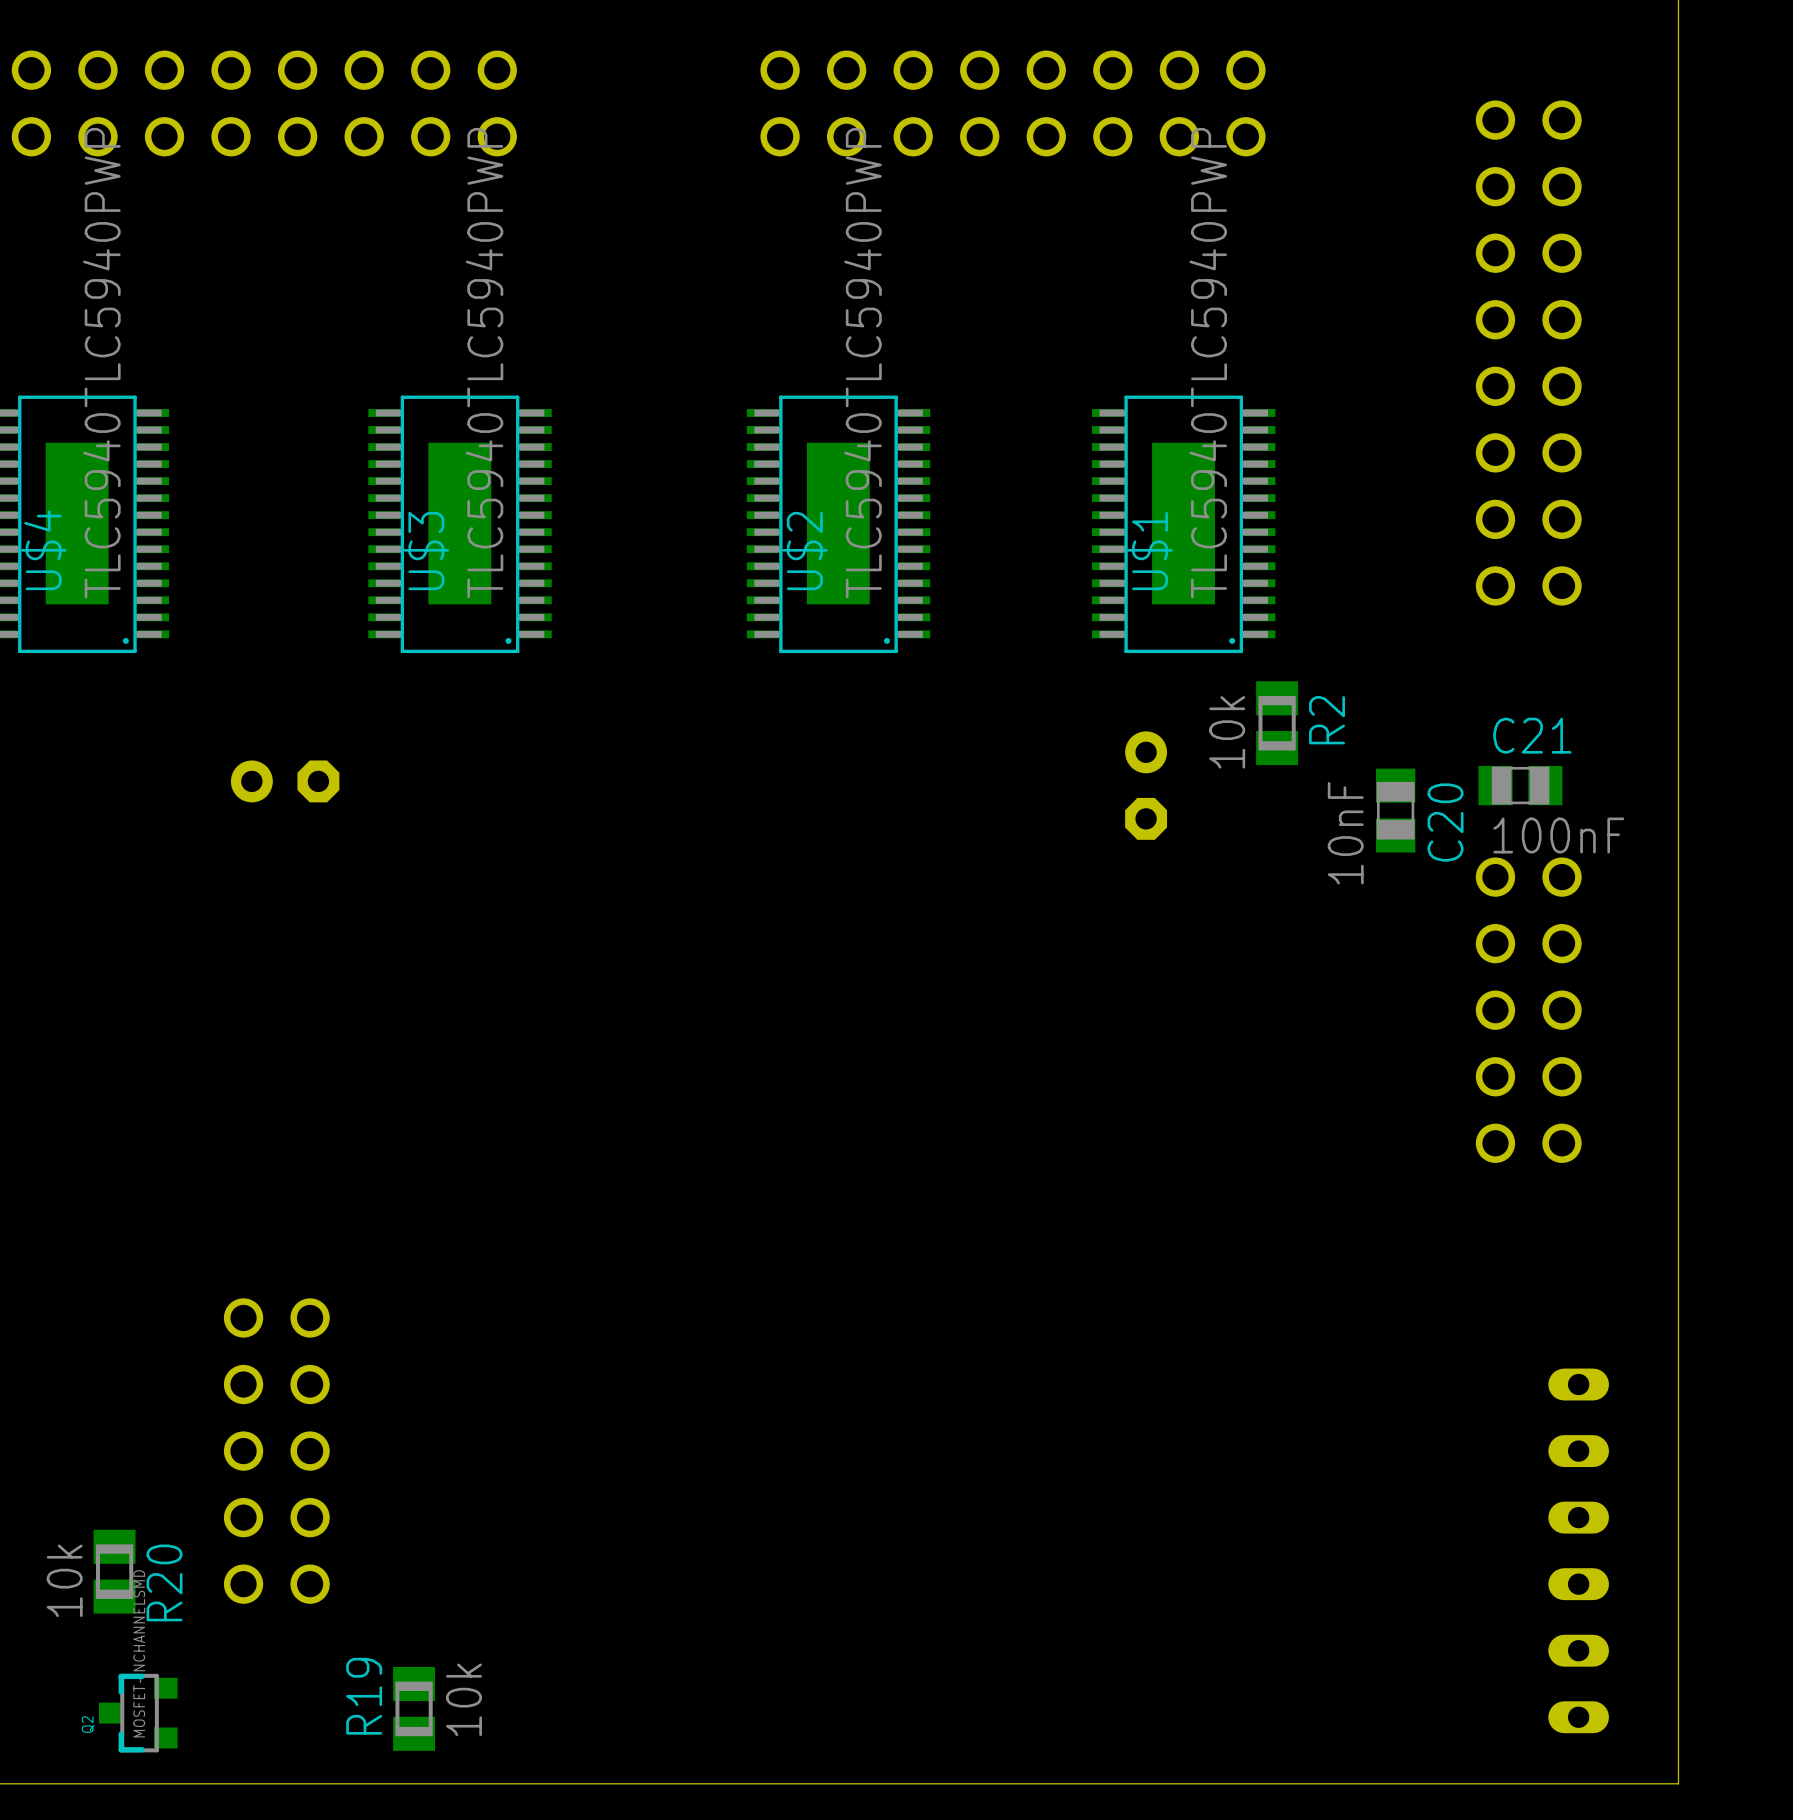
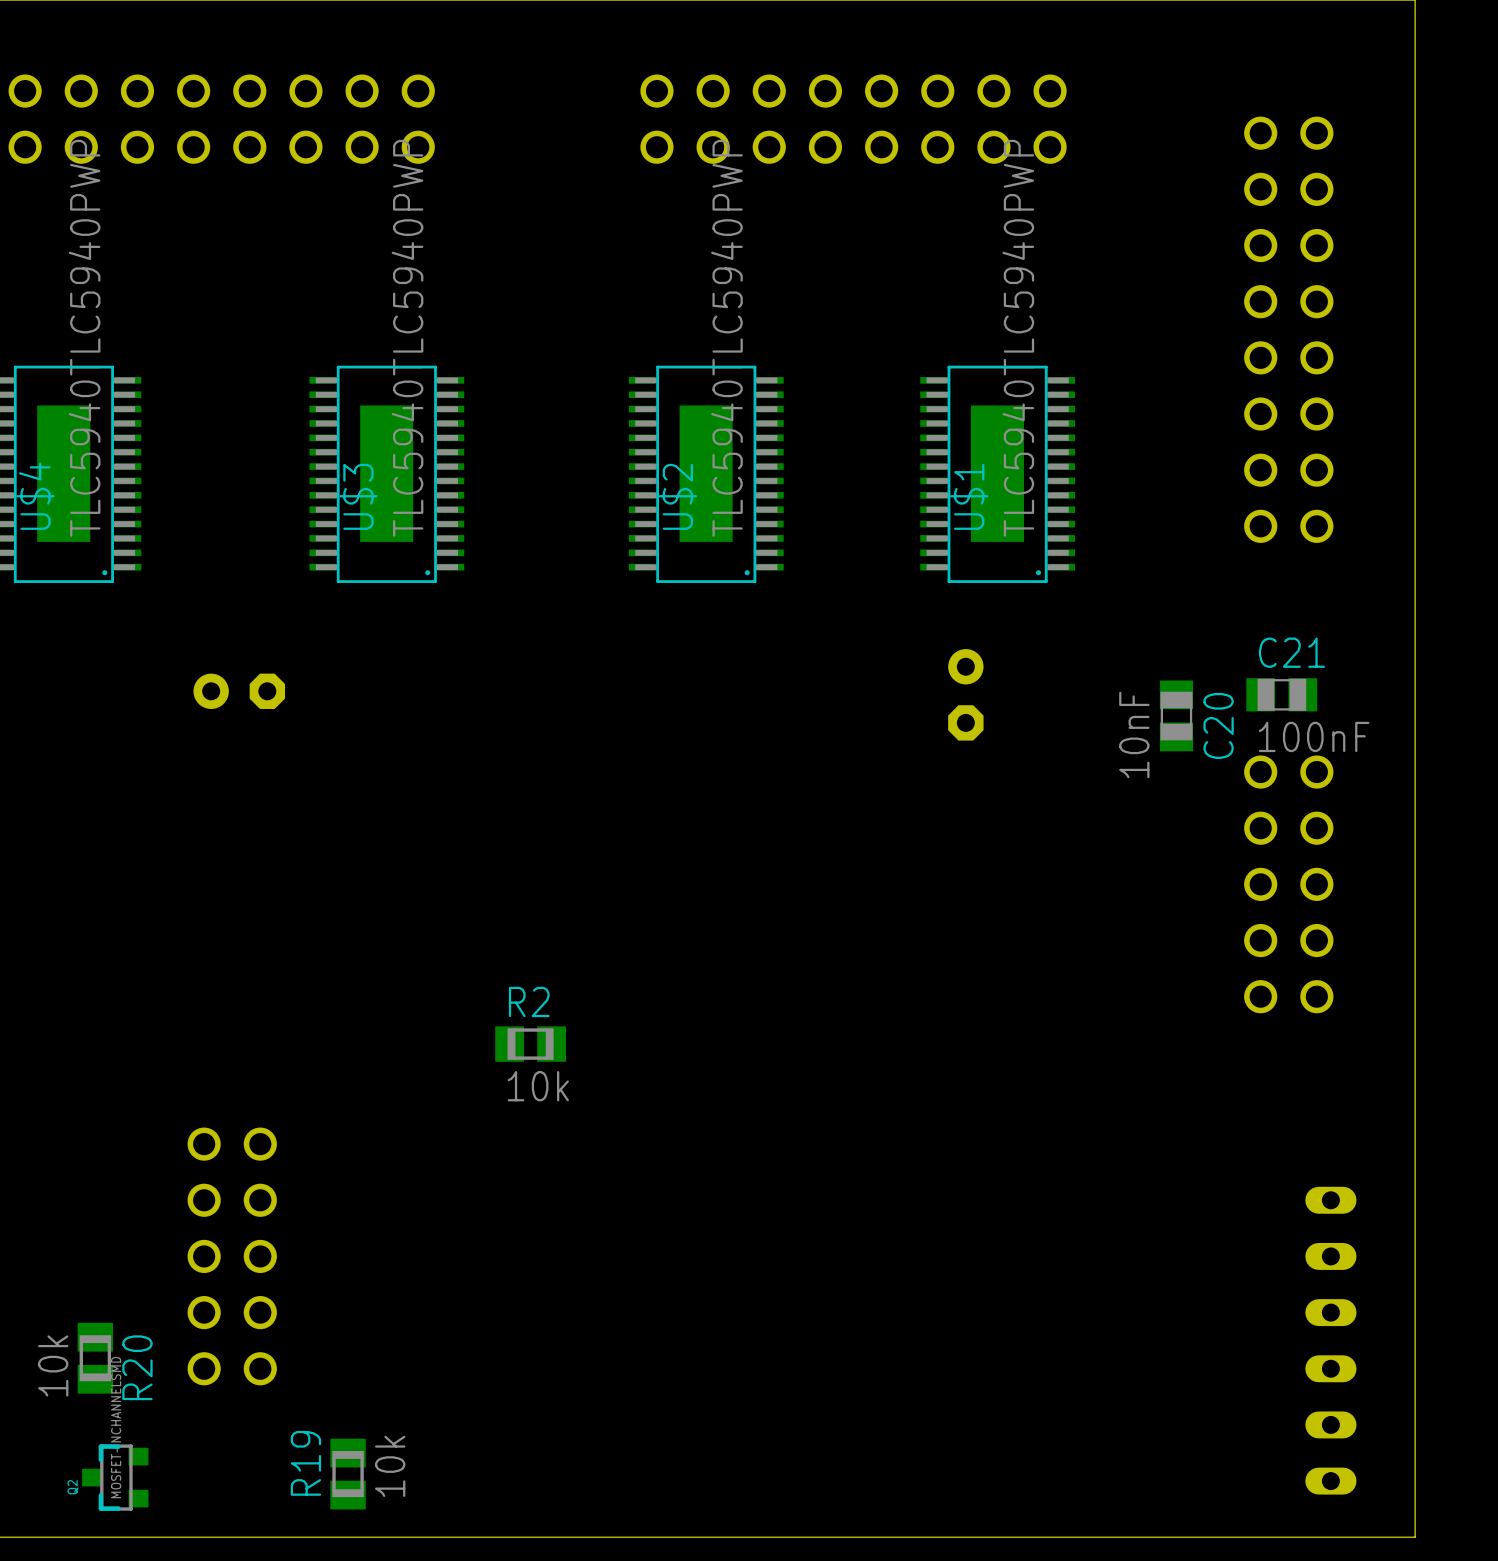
R2 name position: R2 (1327, 720) -> R2 (529, 1001)
R2 rotation: 0° (1277, 723) -> 90° clockwise (530, 1044)
R2 position: (1277, 723) -> (530, 1044)
R2 value position: 10k (1227, 732) -> 10k (538, 1086)

